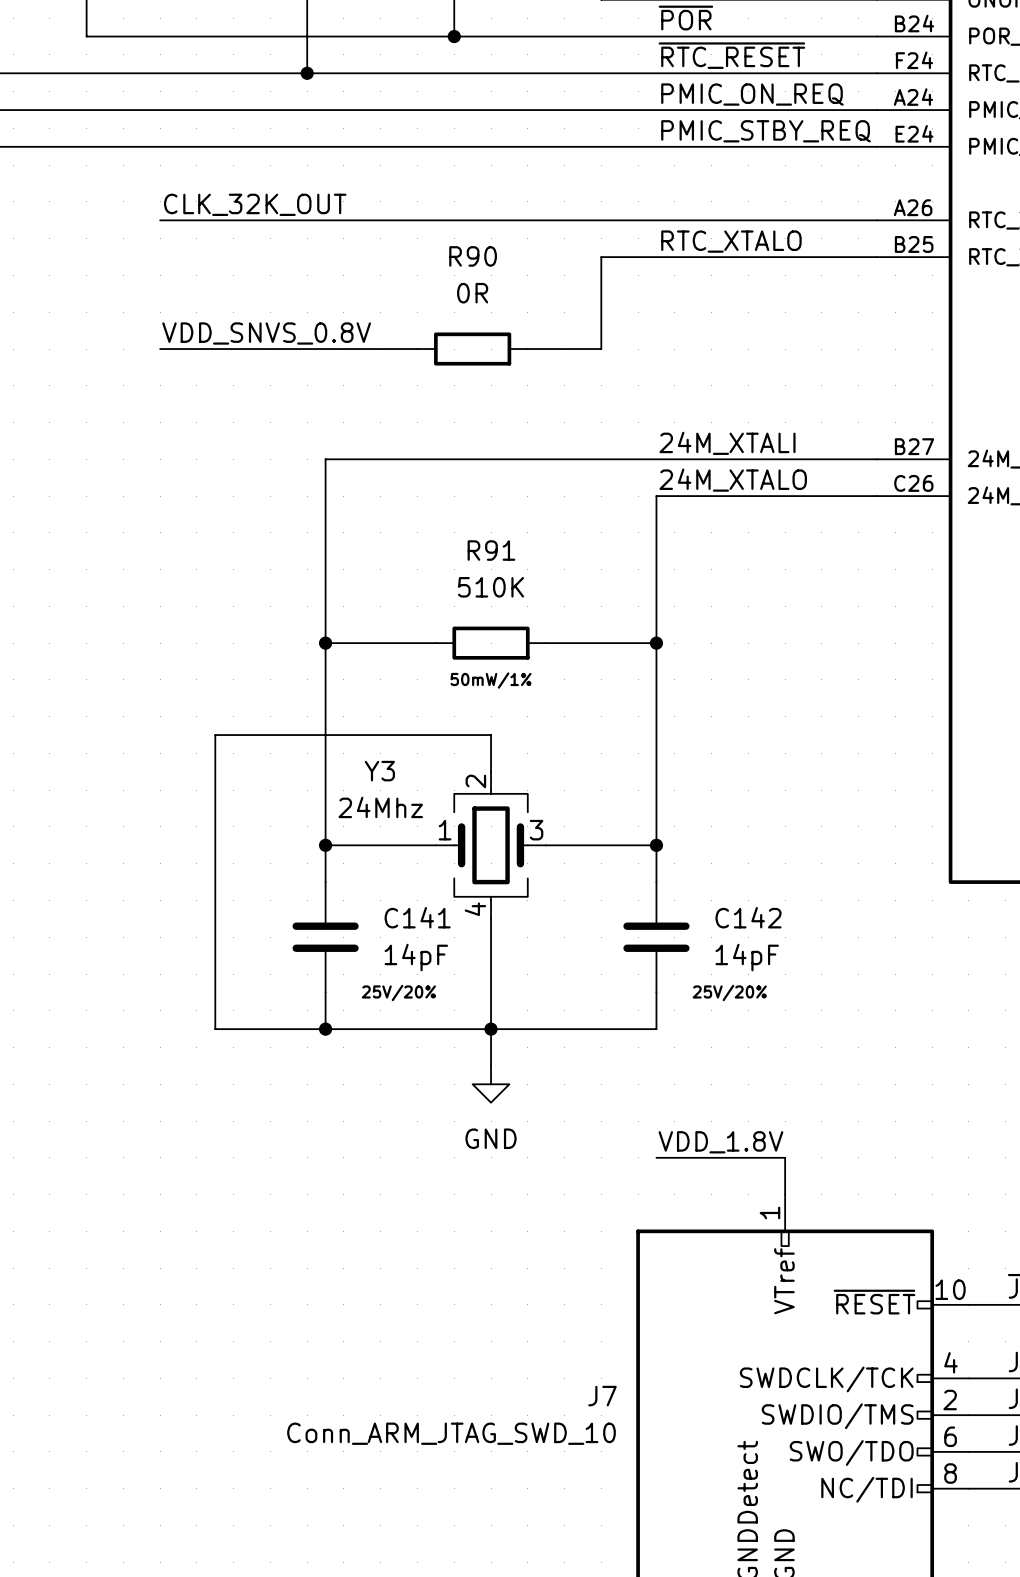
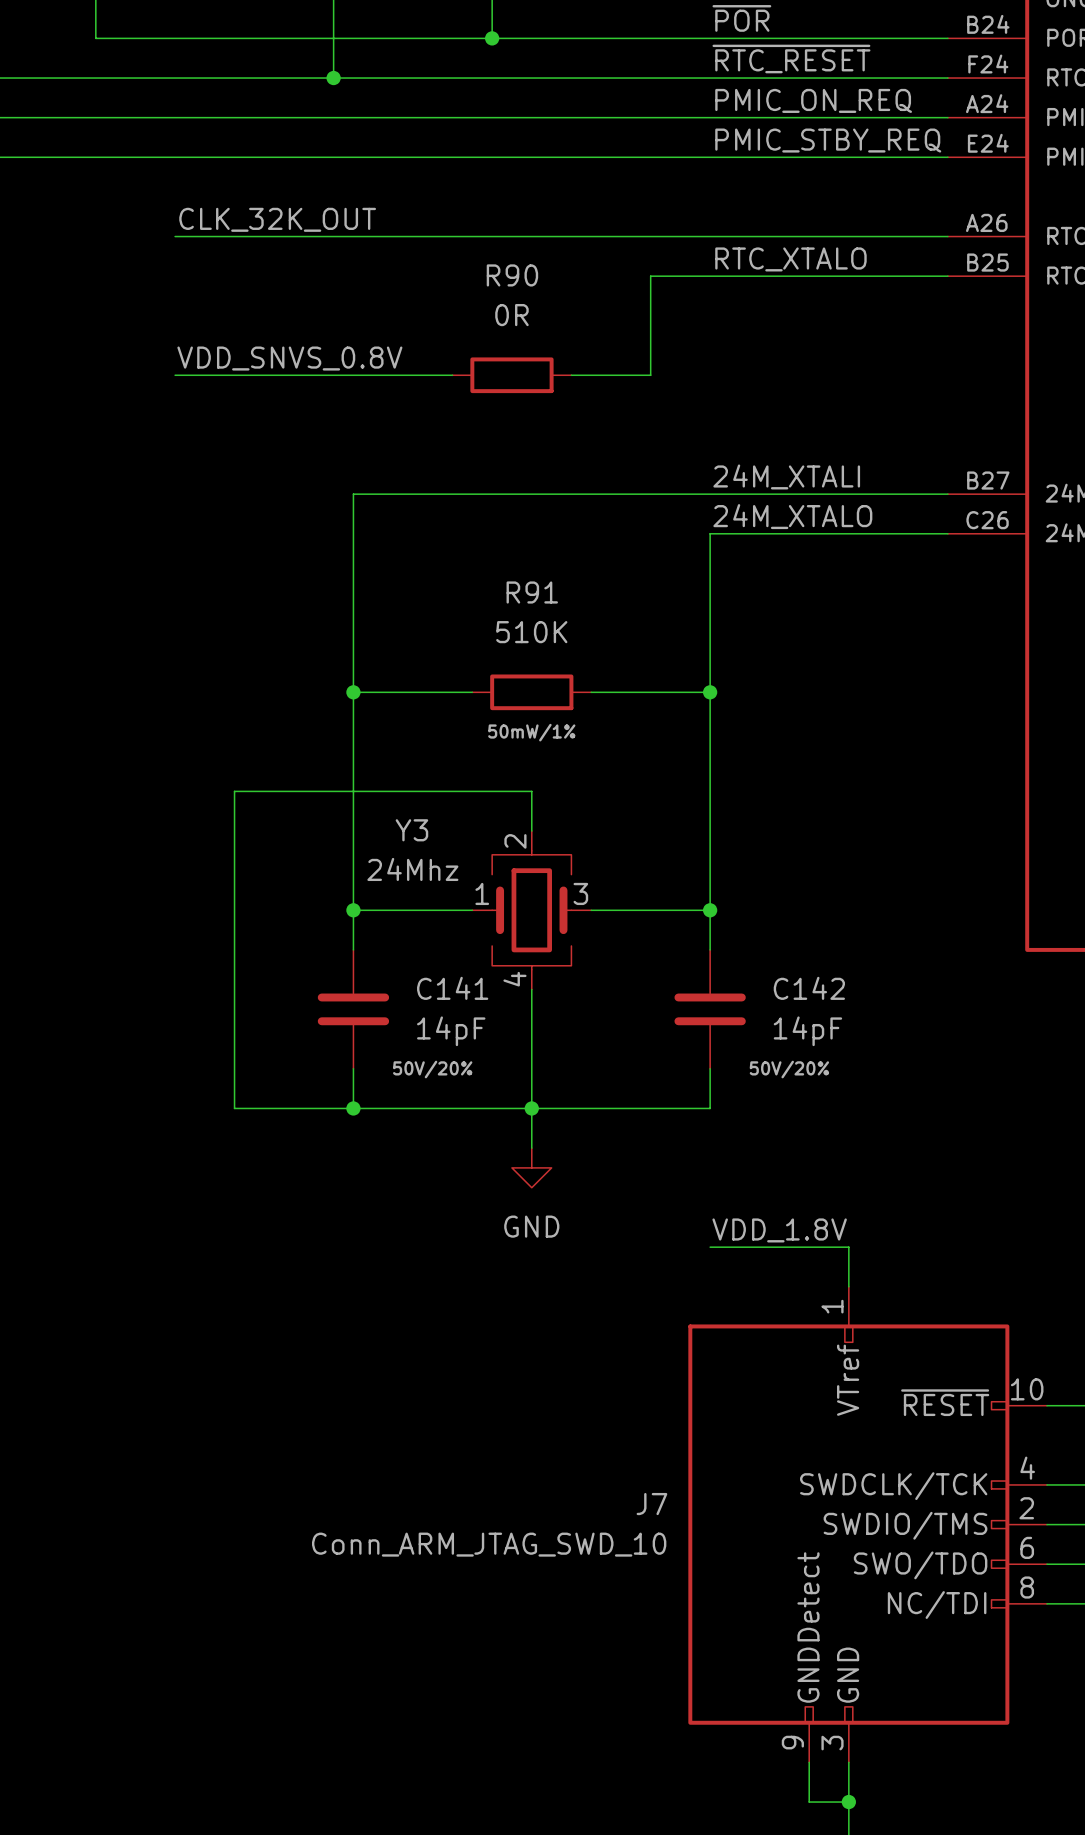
C141 text: 25V/20% (398, 993) -> 50V/20% (432, 1069)
C142 text: 25V/20% (729, 993) -> 50V/20% (789, 1069)

